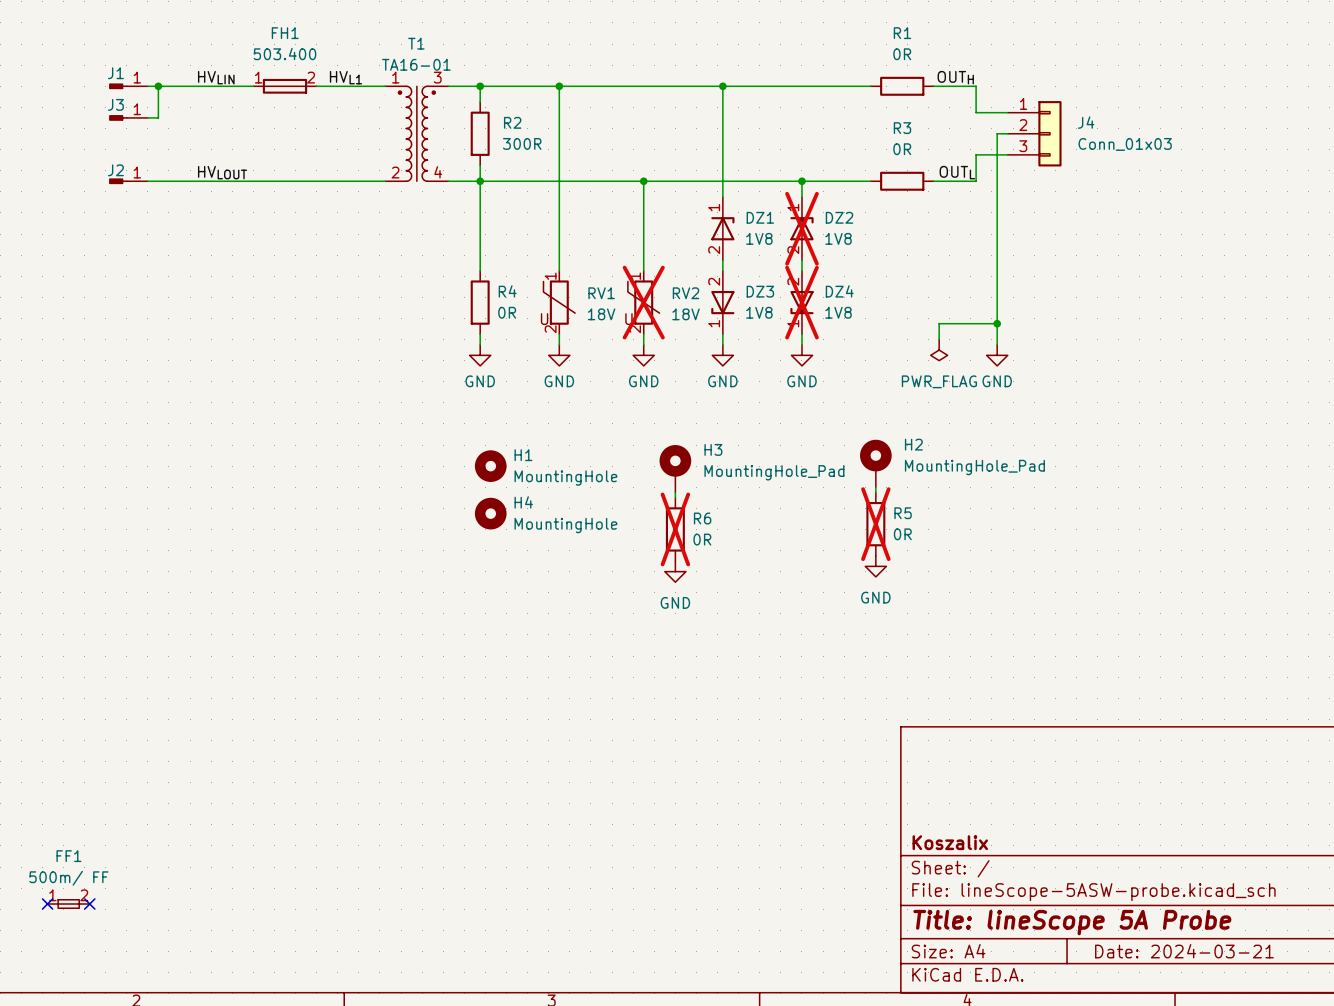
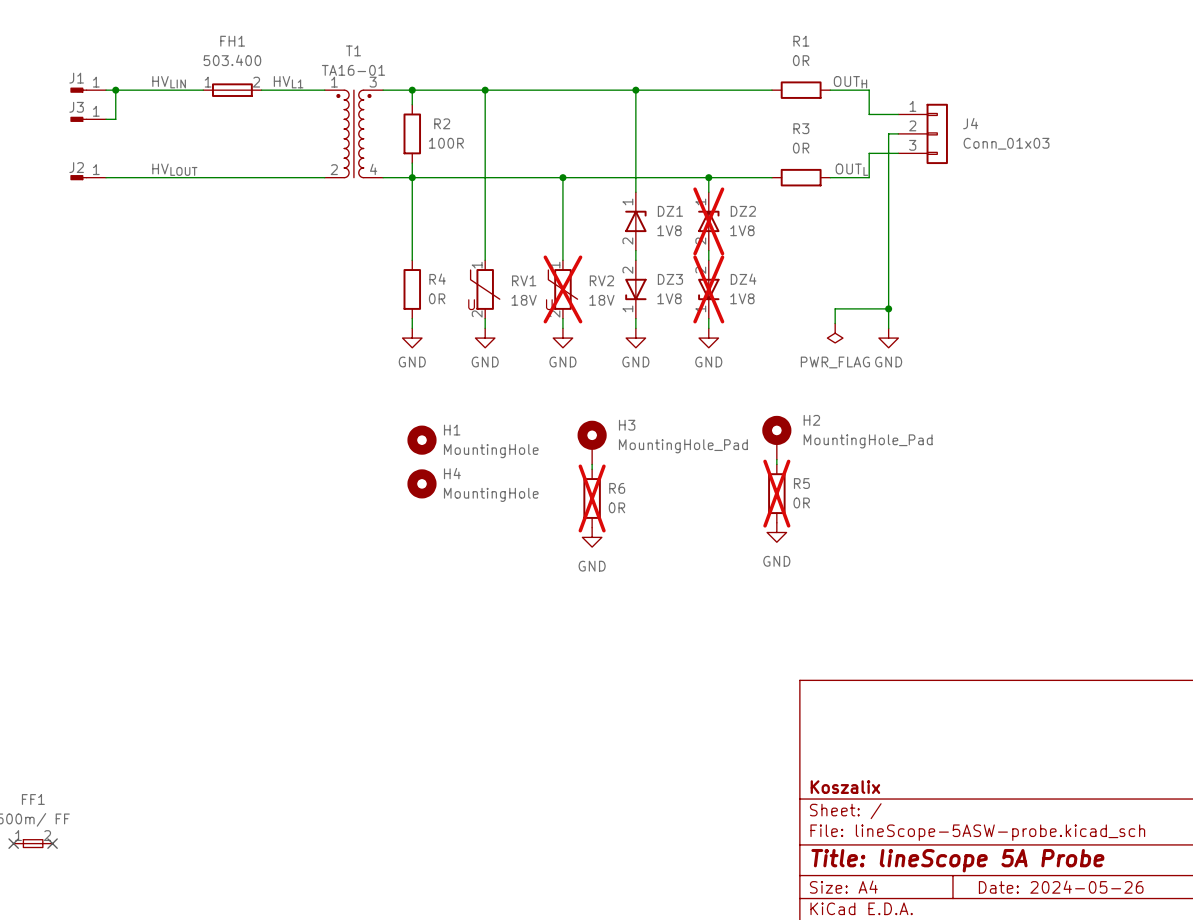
R2 value: 300R (522, 143) -> 100R (446, 143)
title block: Date: 2024-03-21 (1184, 951) -> Date: 2024-05-26 (1061, 887)

